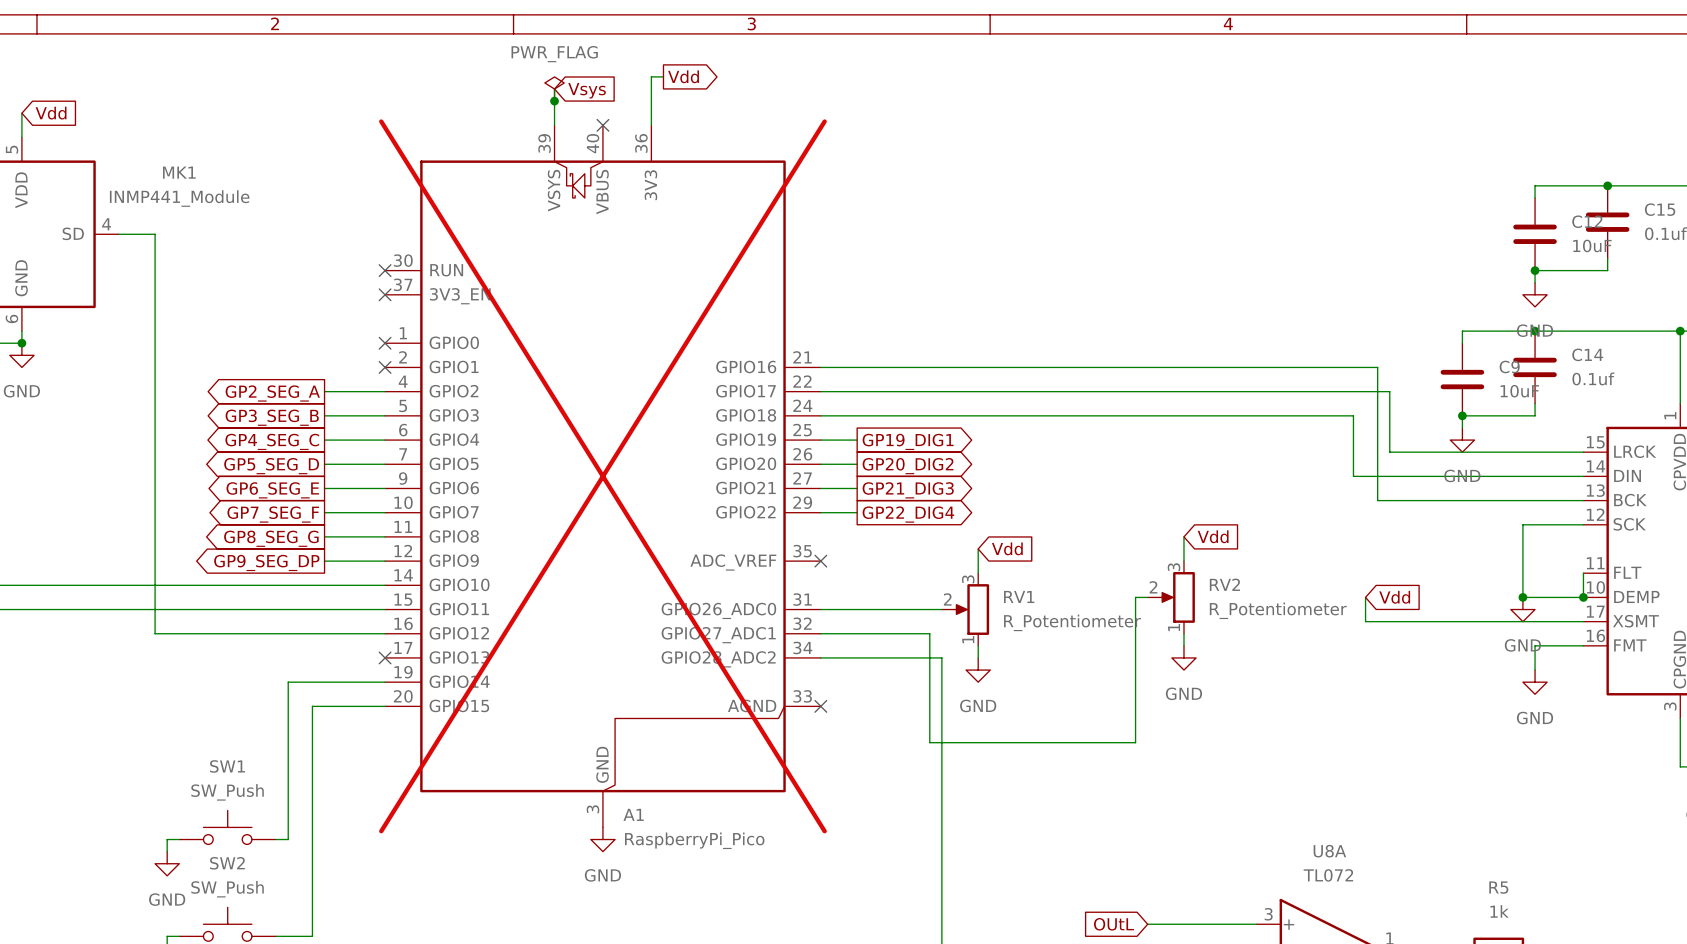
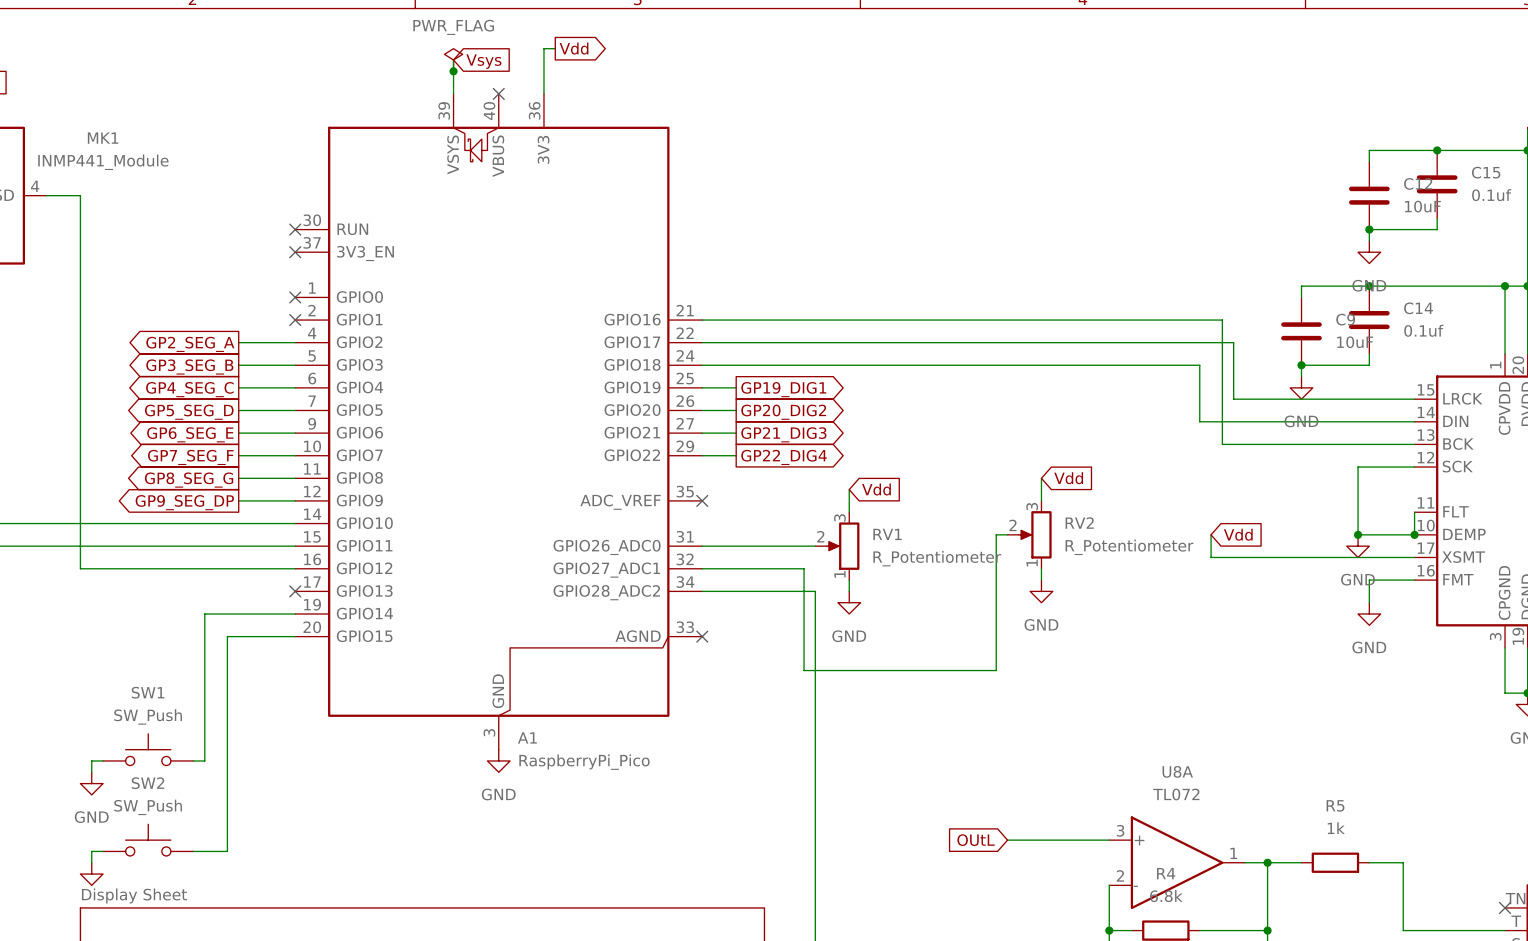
A1 do-not-place cross: (602, 476) -> none

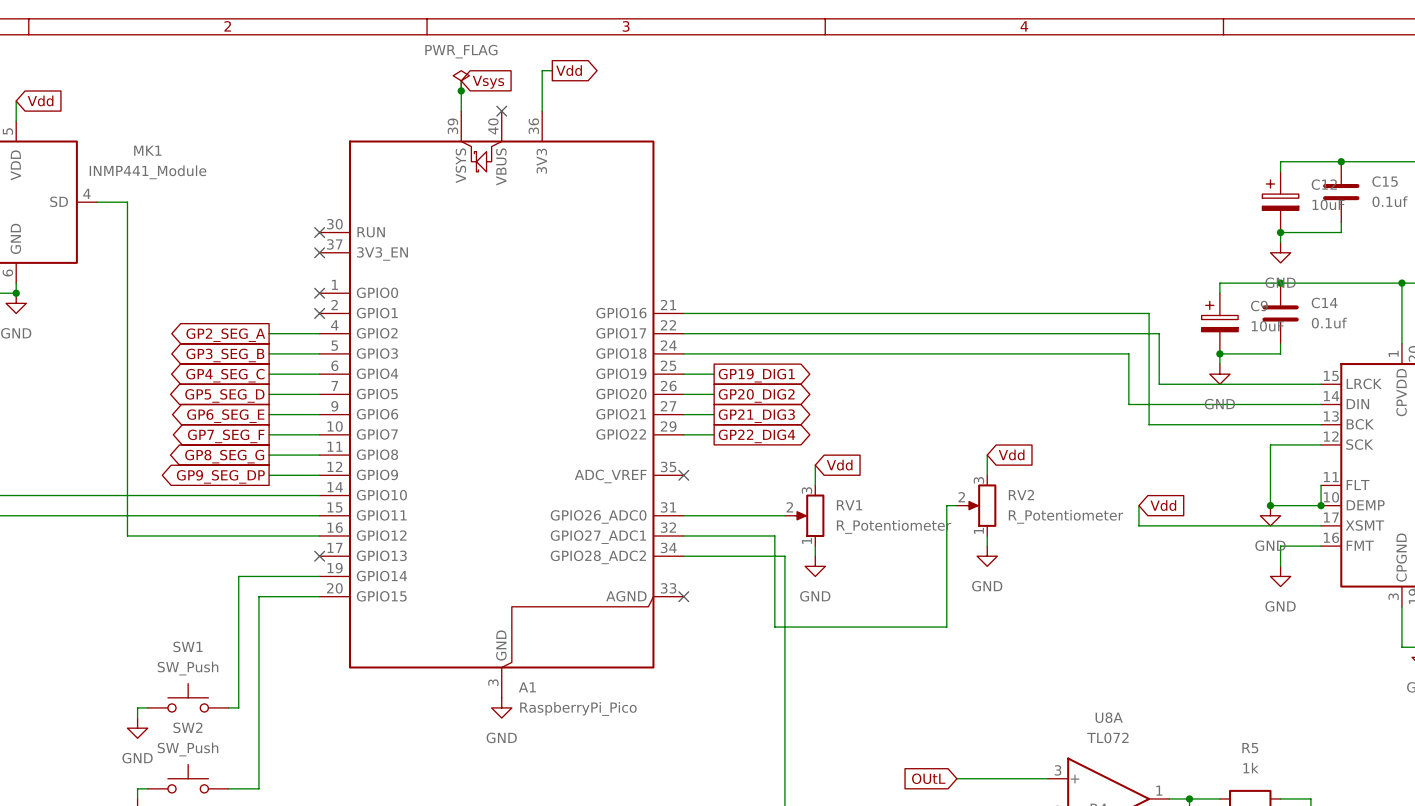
C12 symbol: [1348, 161, 1390, 230] -> [1262, 171, 1299, 233]
C9 symbol: [1281, 297, 1322, 366] -> [1201, 293, 1239, 354]

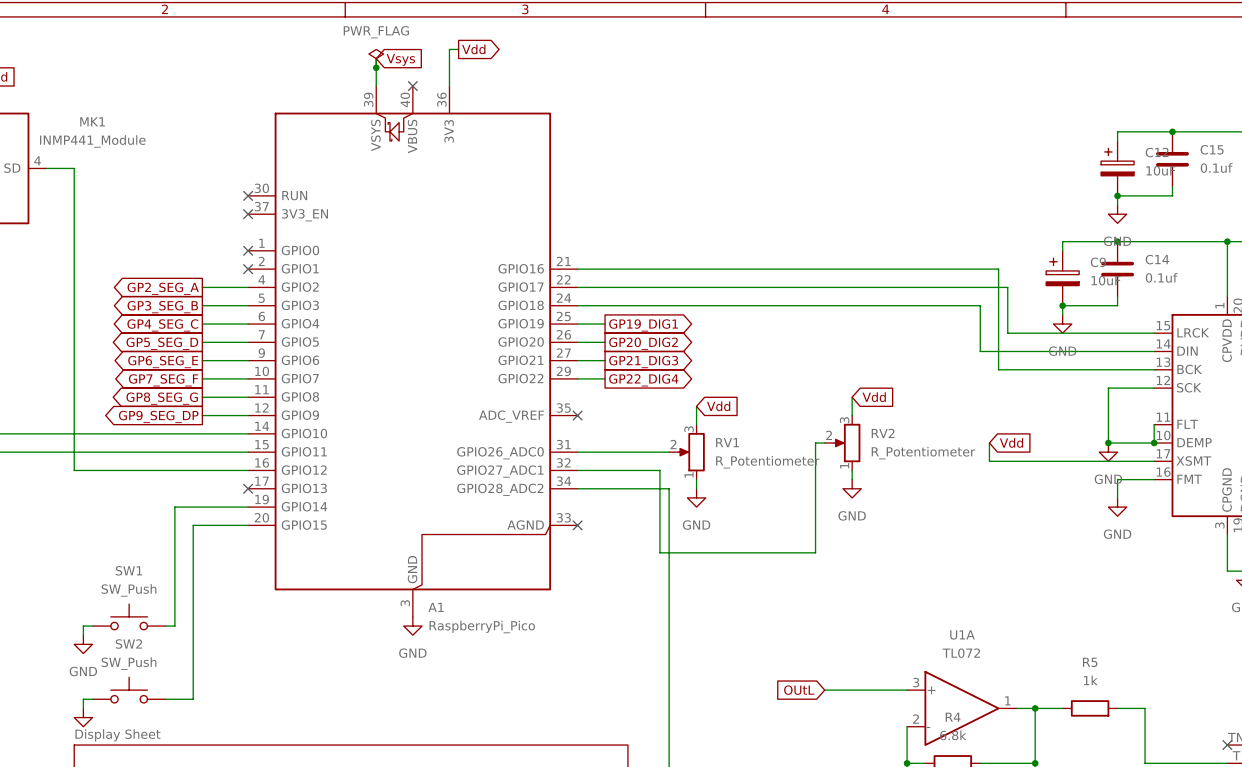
U8A name: U8A (1109, 717) -> U1A (962, 634)

